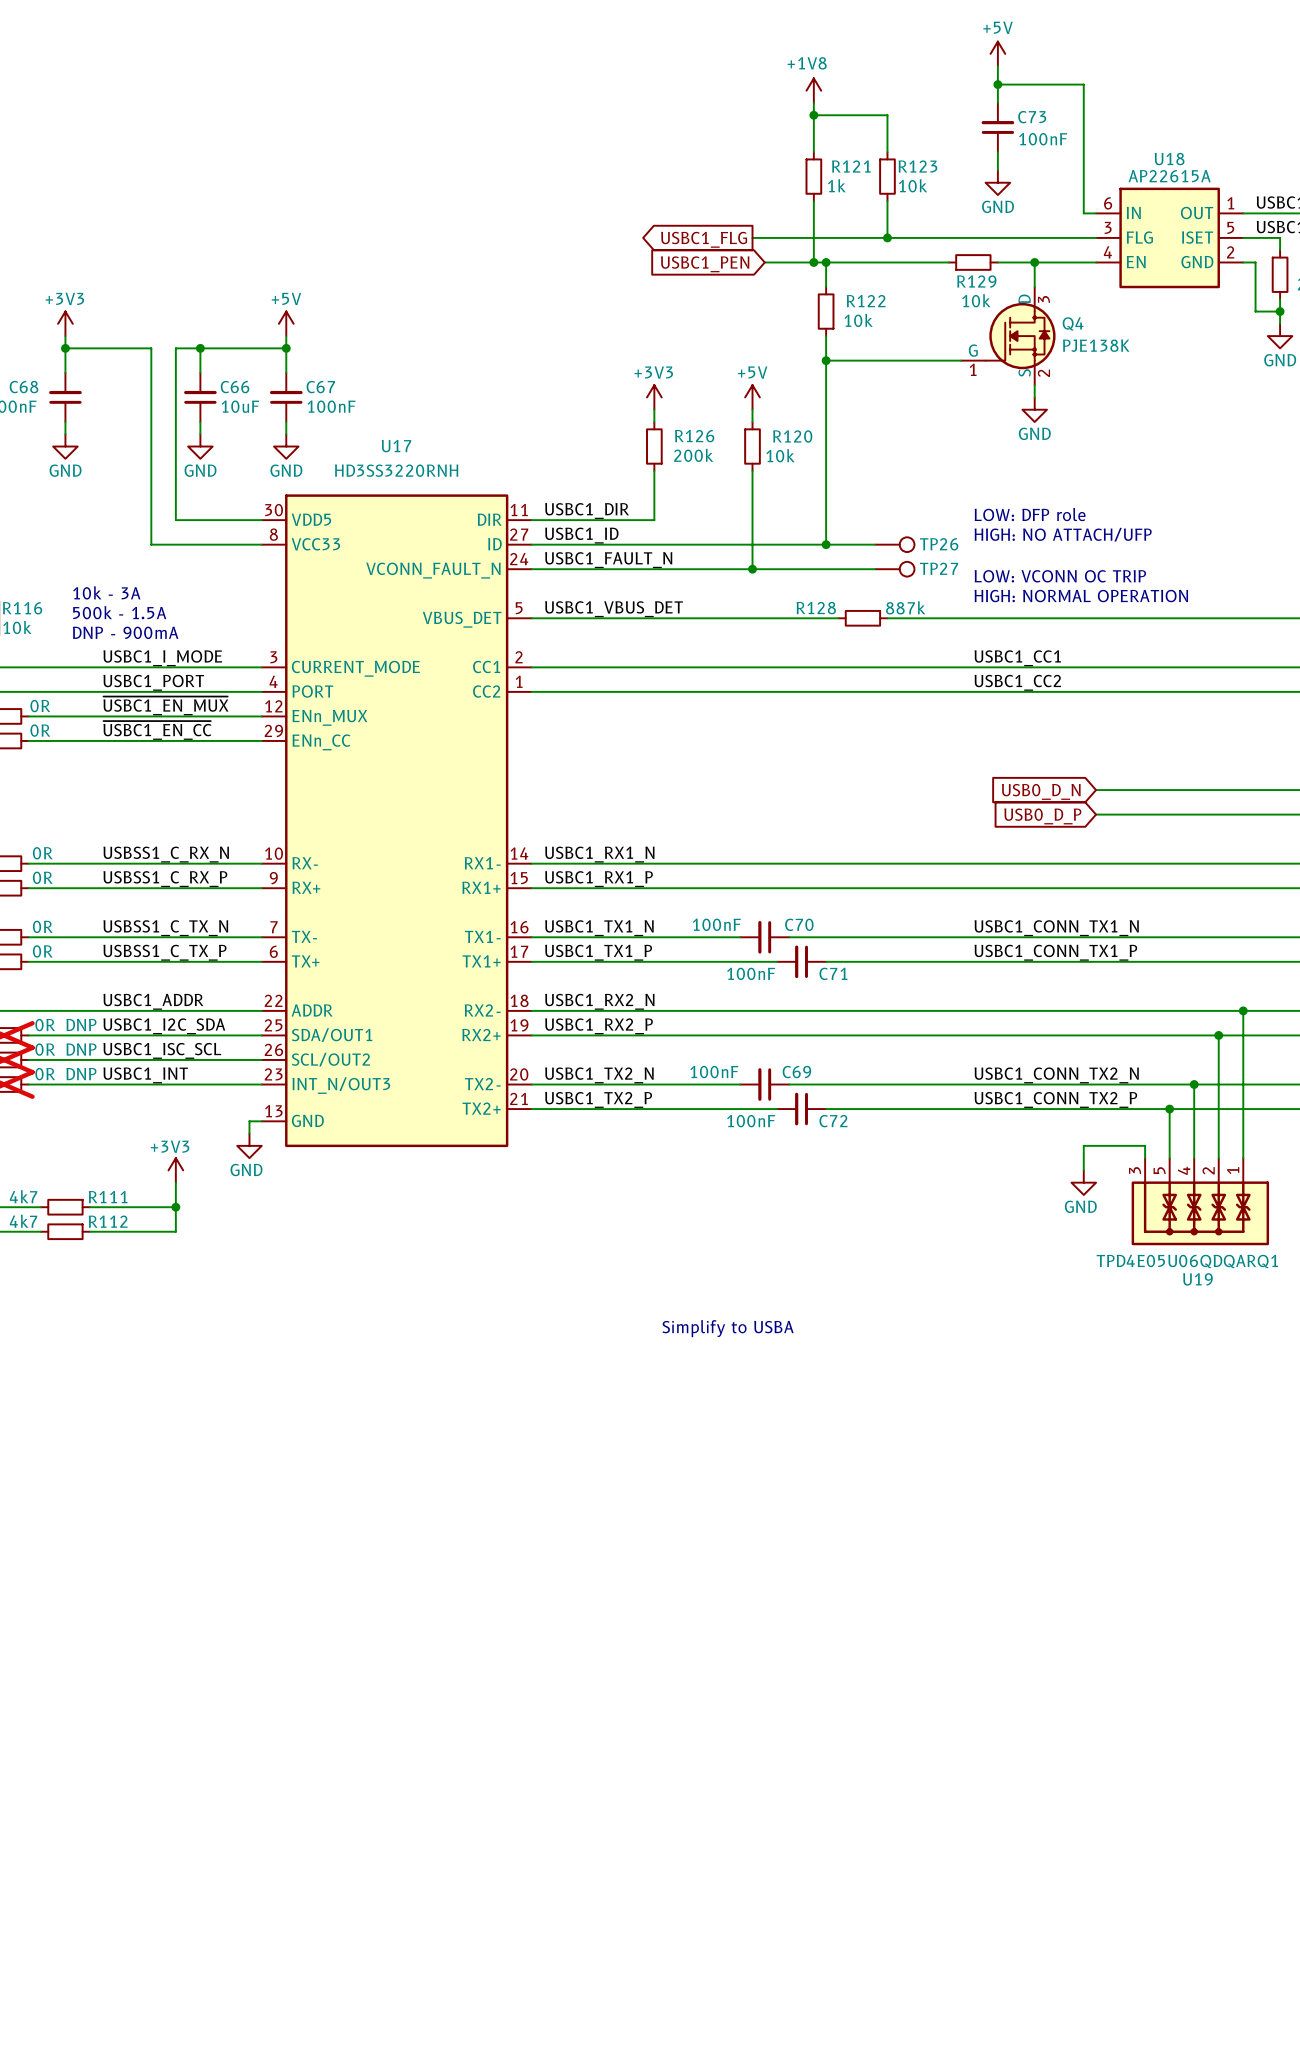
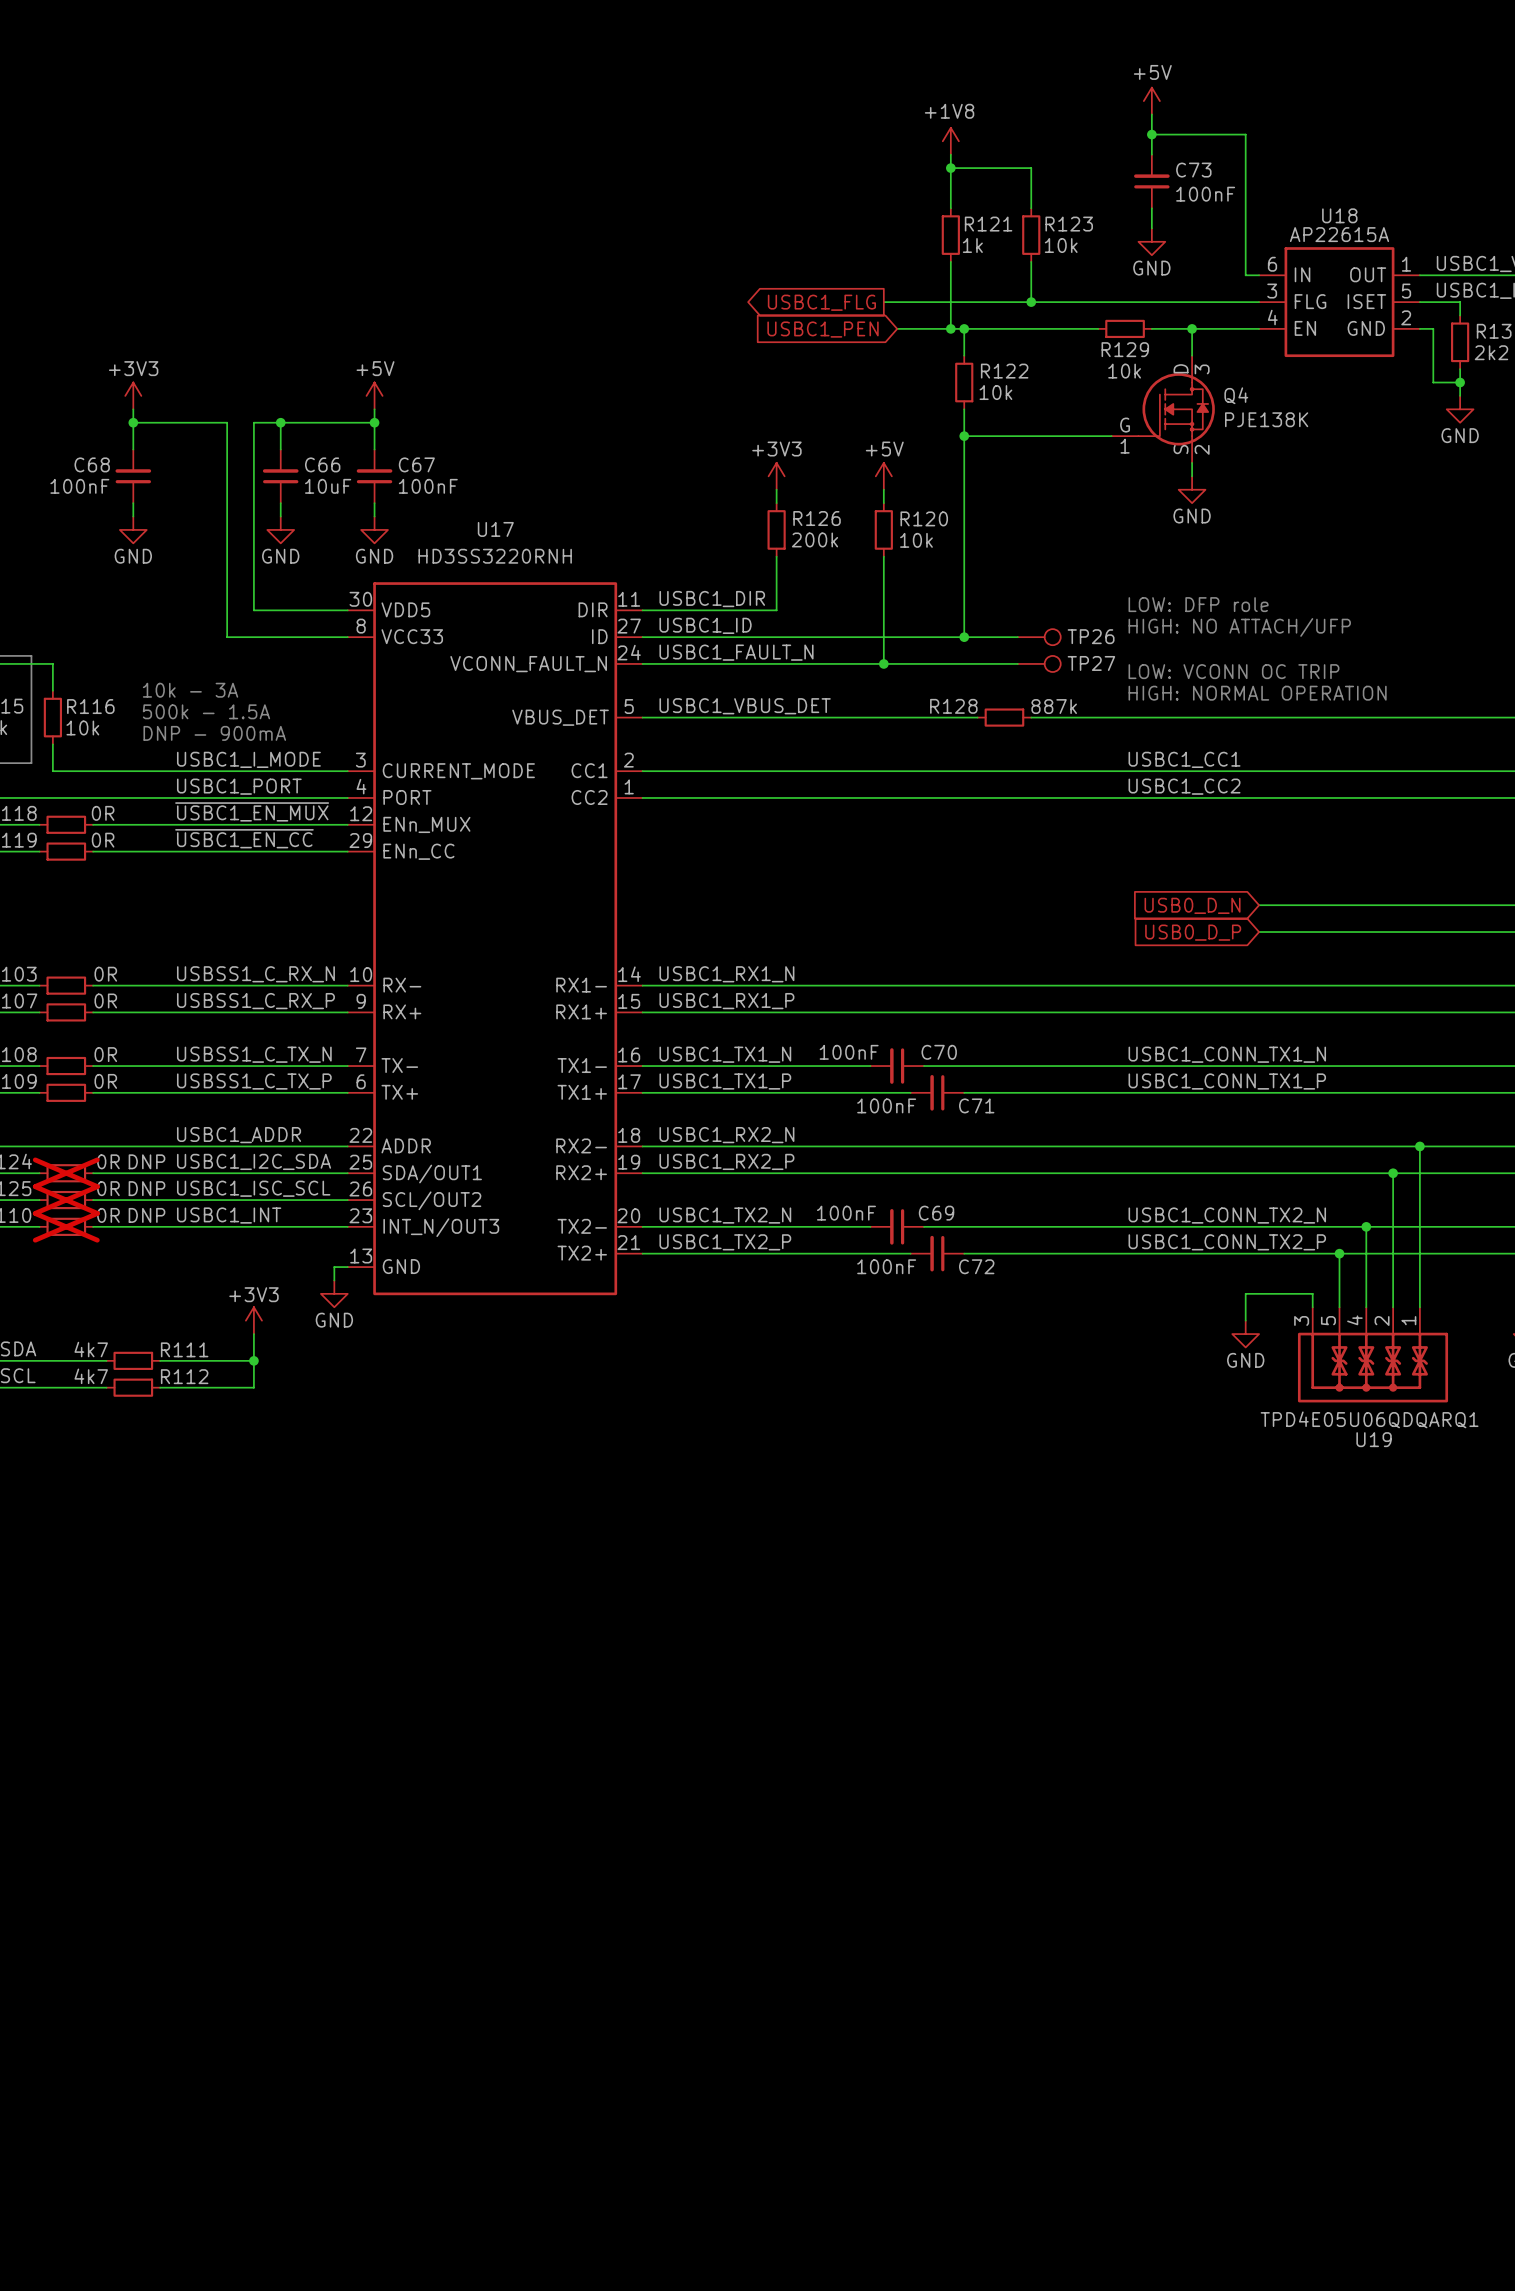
text: Simplify to USBA (728, 1328) -> none

